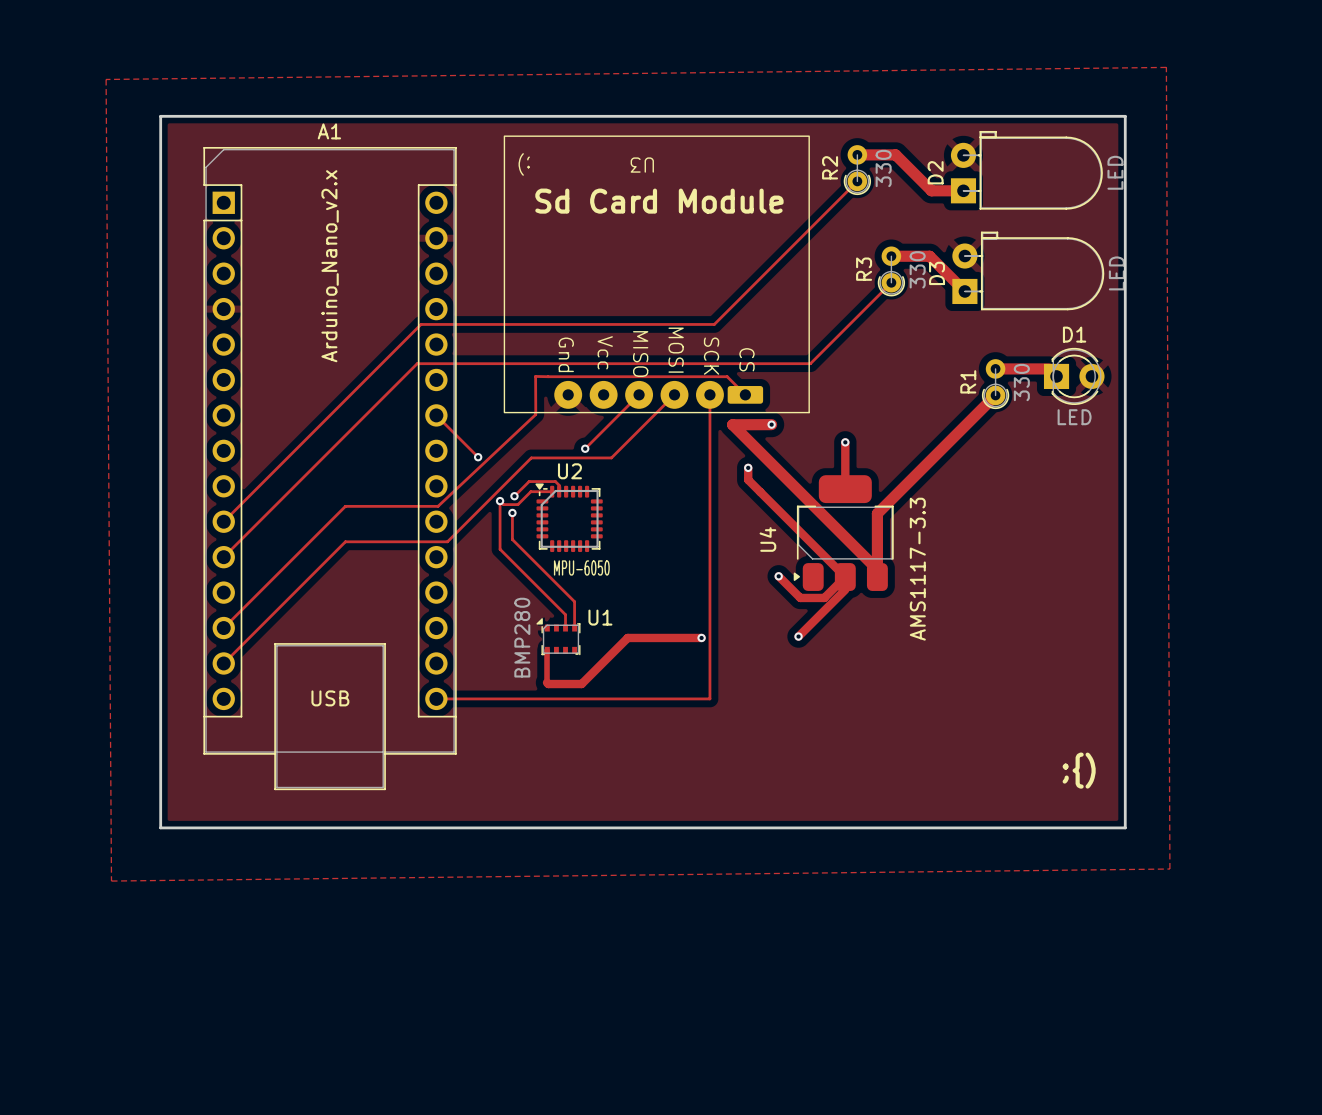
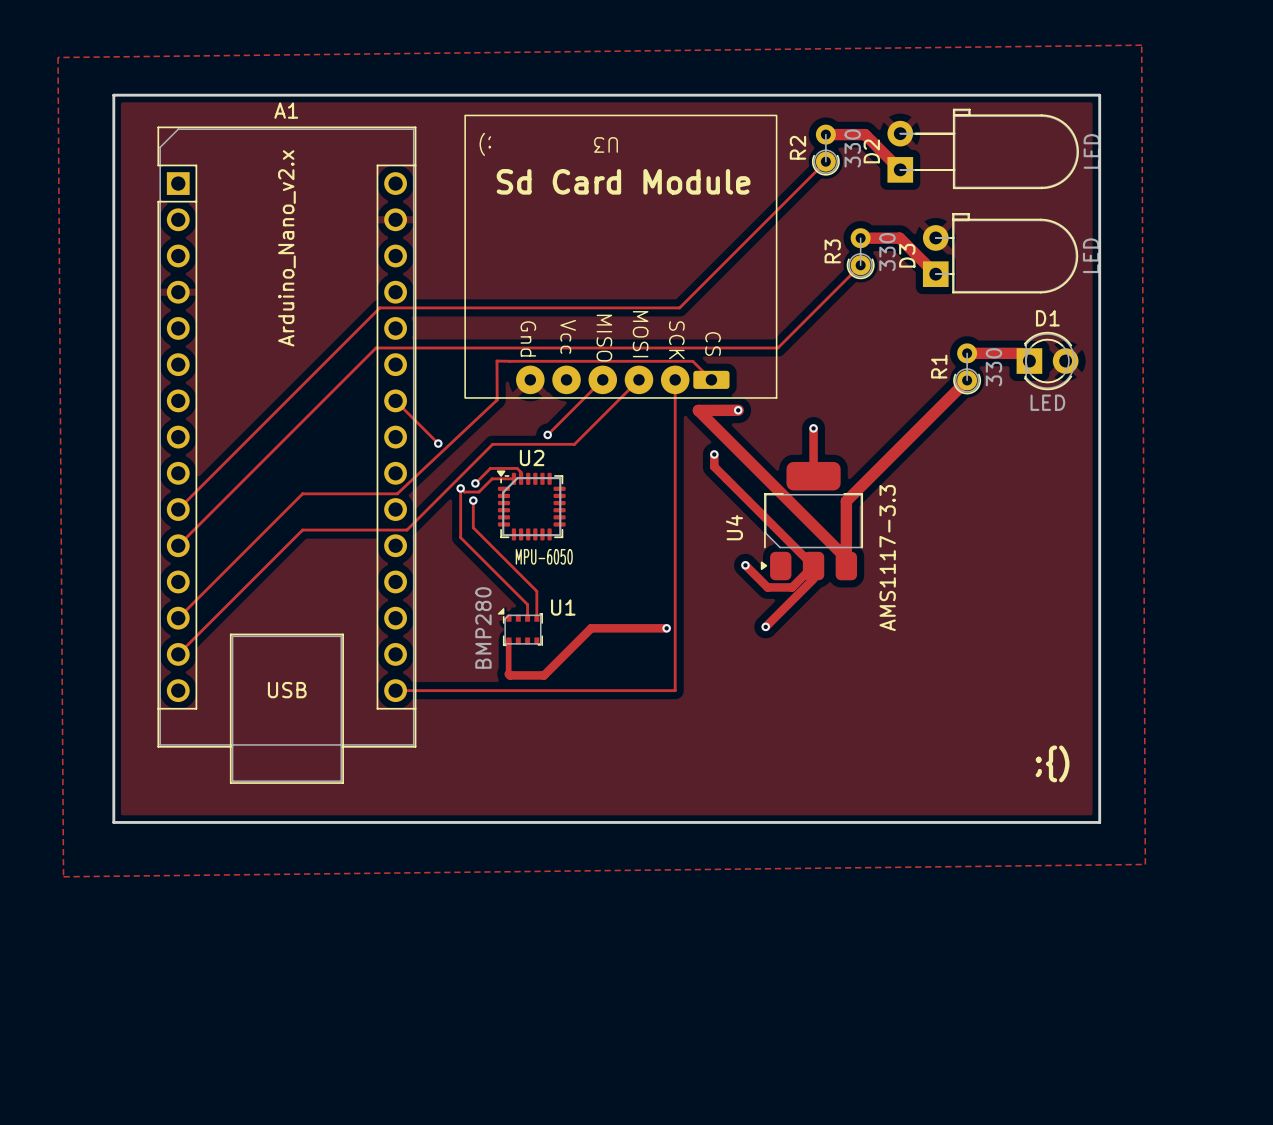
D2 footprint: [950, 130, 1103, 210] -> [887, 108, 1079, 190]
track: (930, 189) (963, 190) -> none

